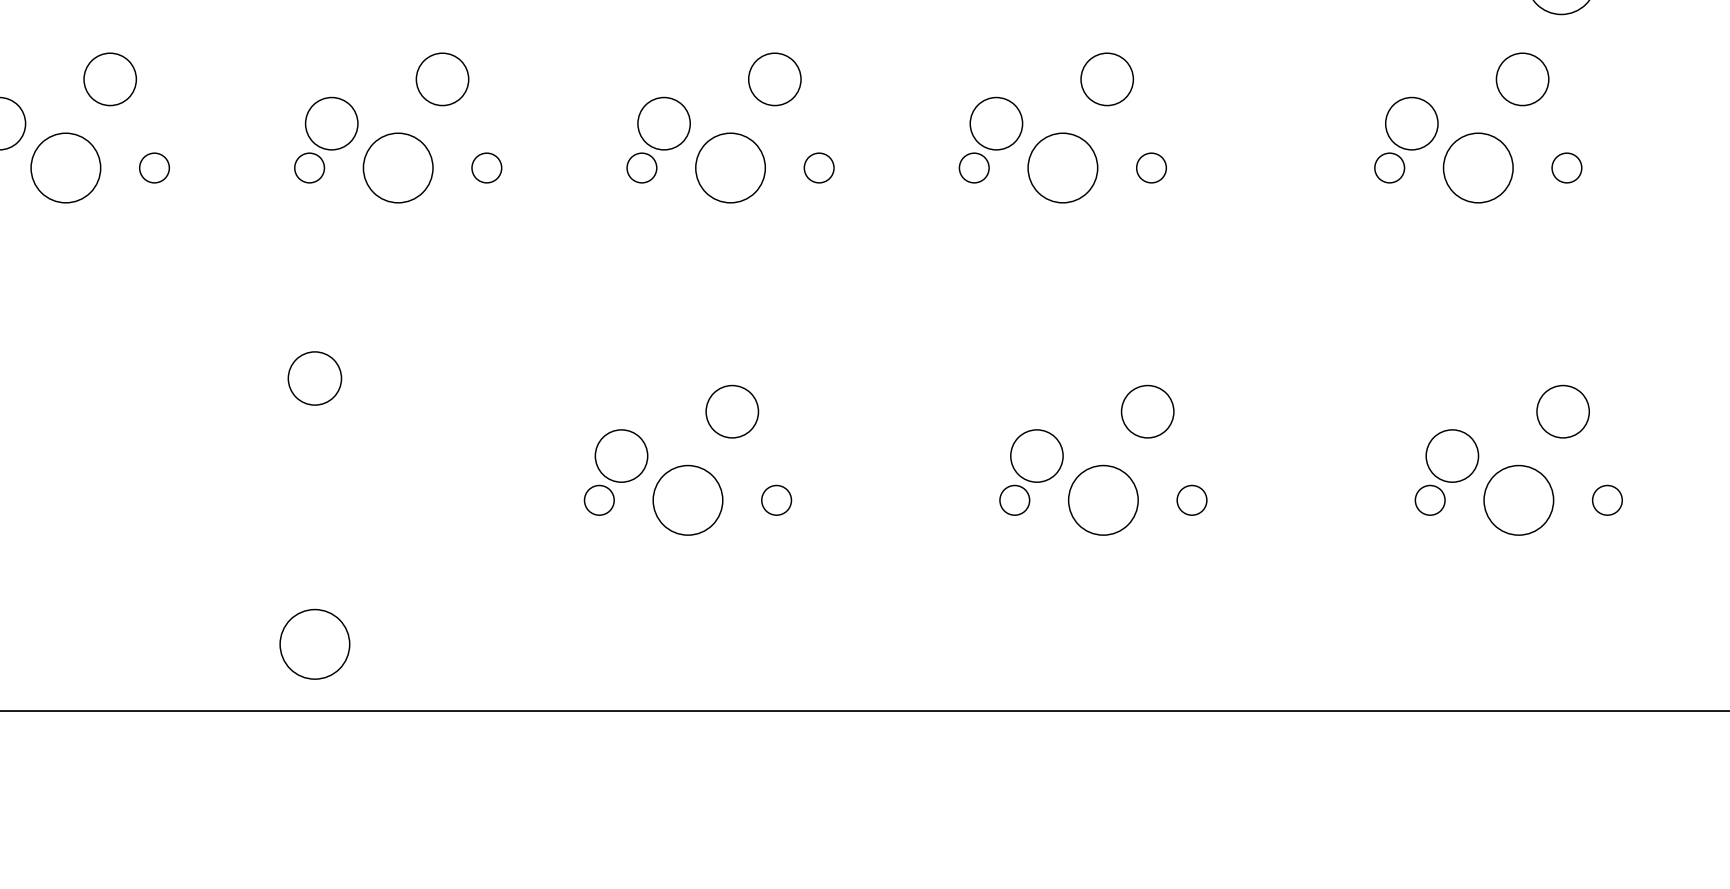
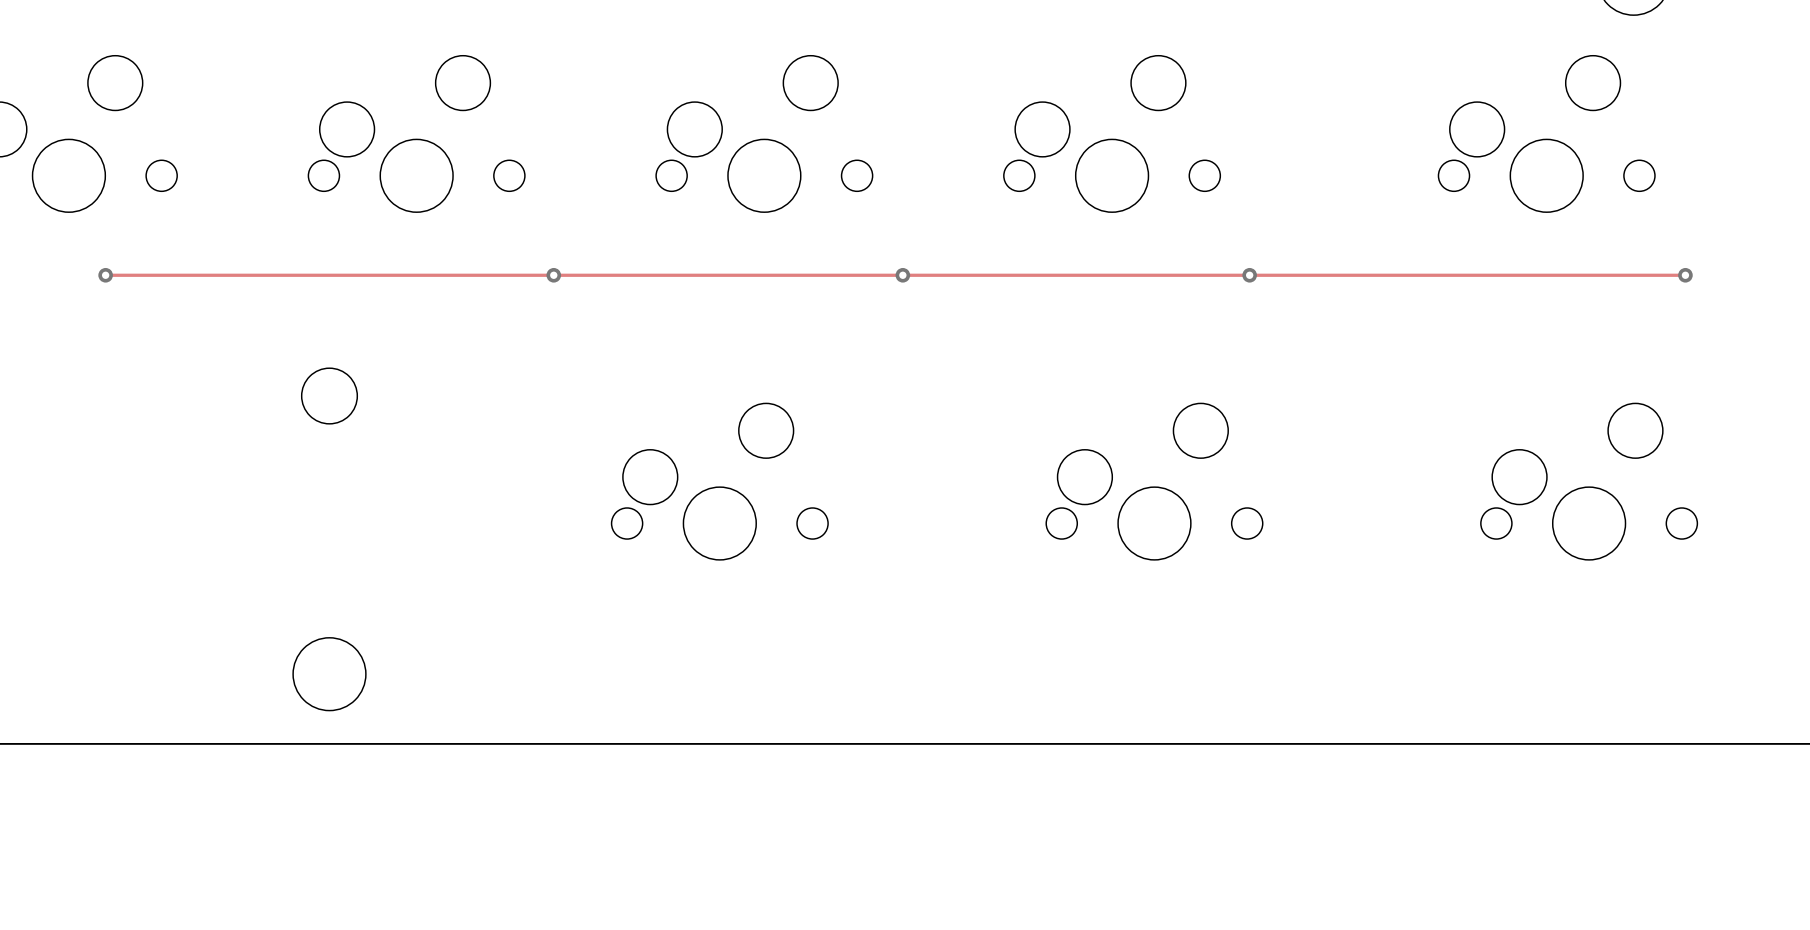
track: none -> (105, 275) (1685, 275)
via: none -> (105, 275)
via: none -> (553, 275)
via: none -> (902, 275)
via: none -> (1249, 275)
via: none -> (1685, 275)

